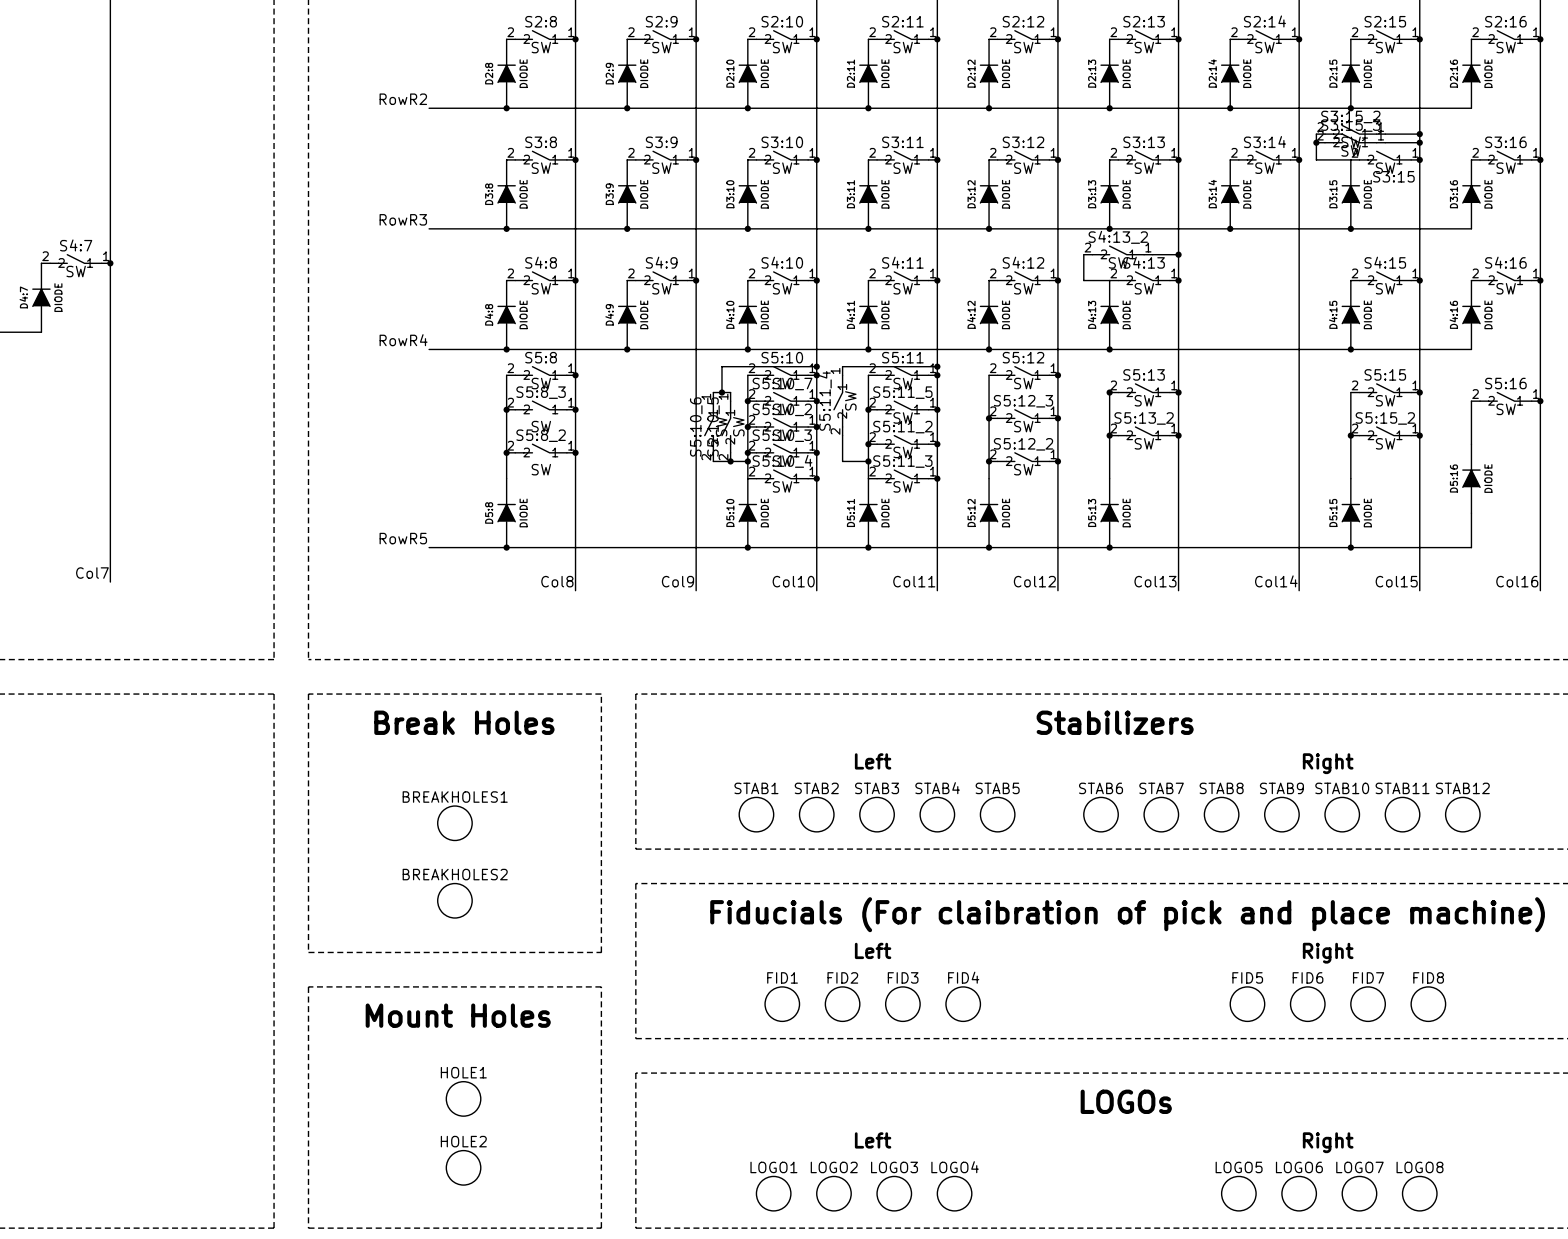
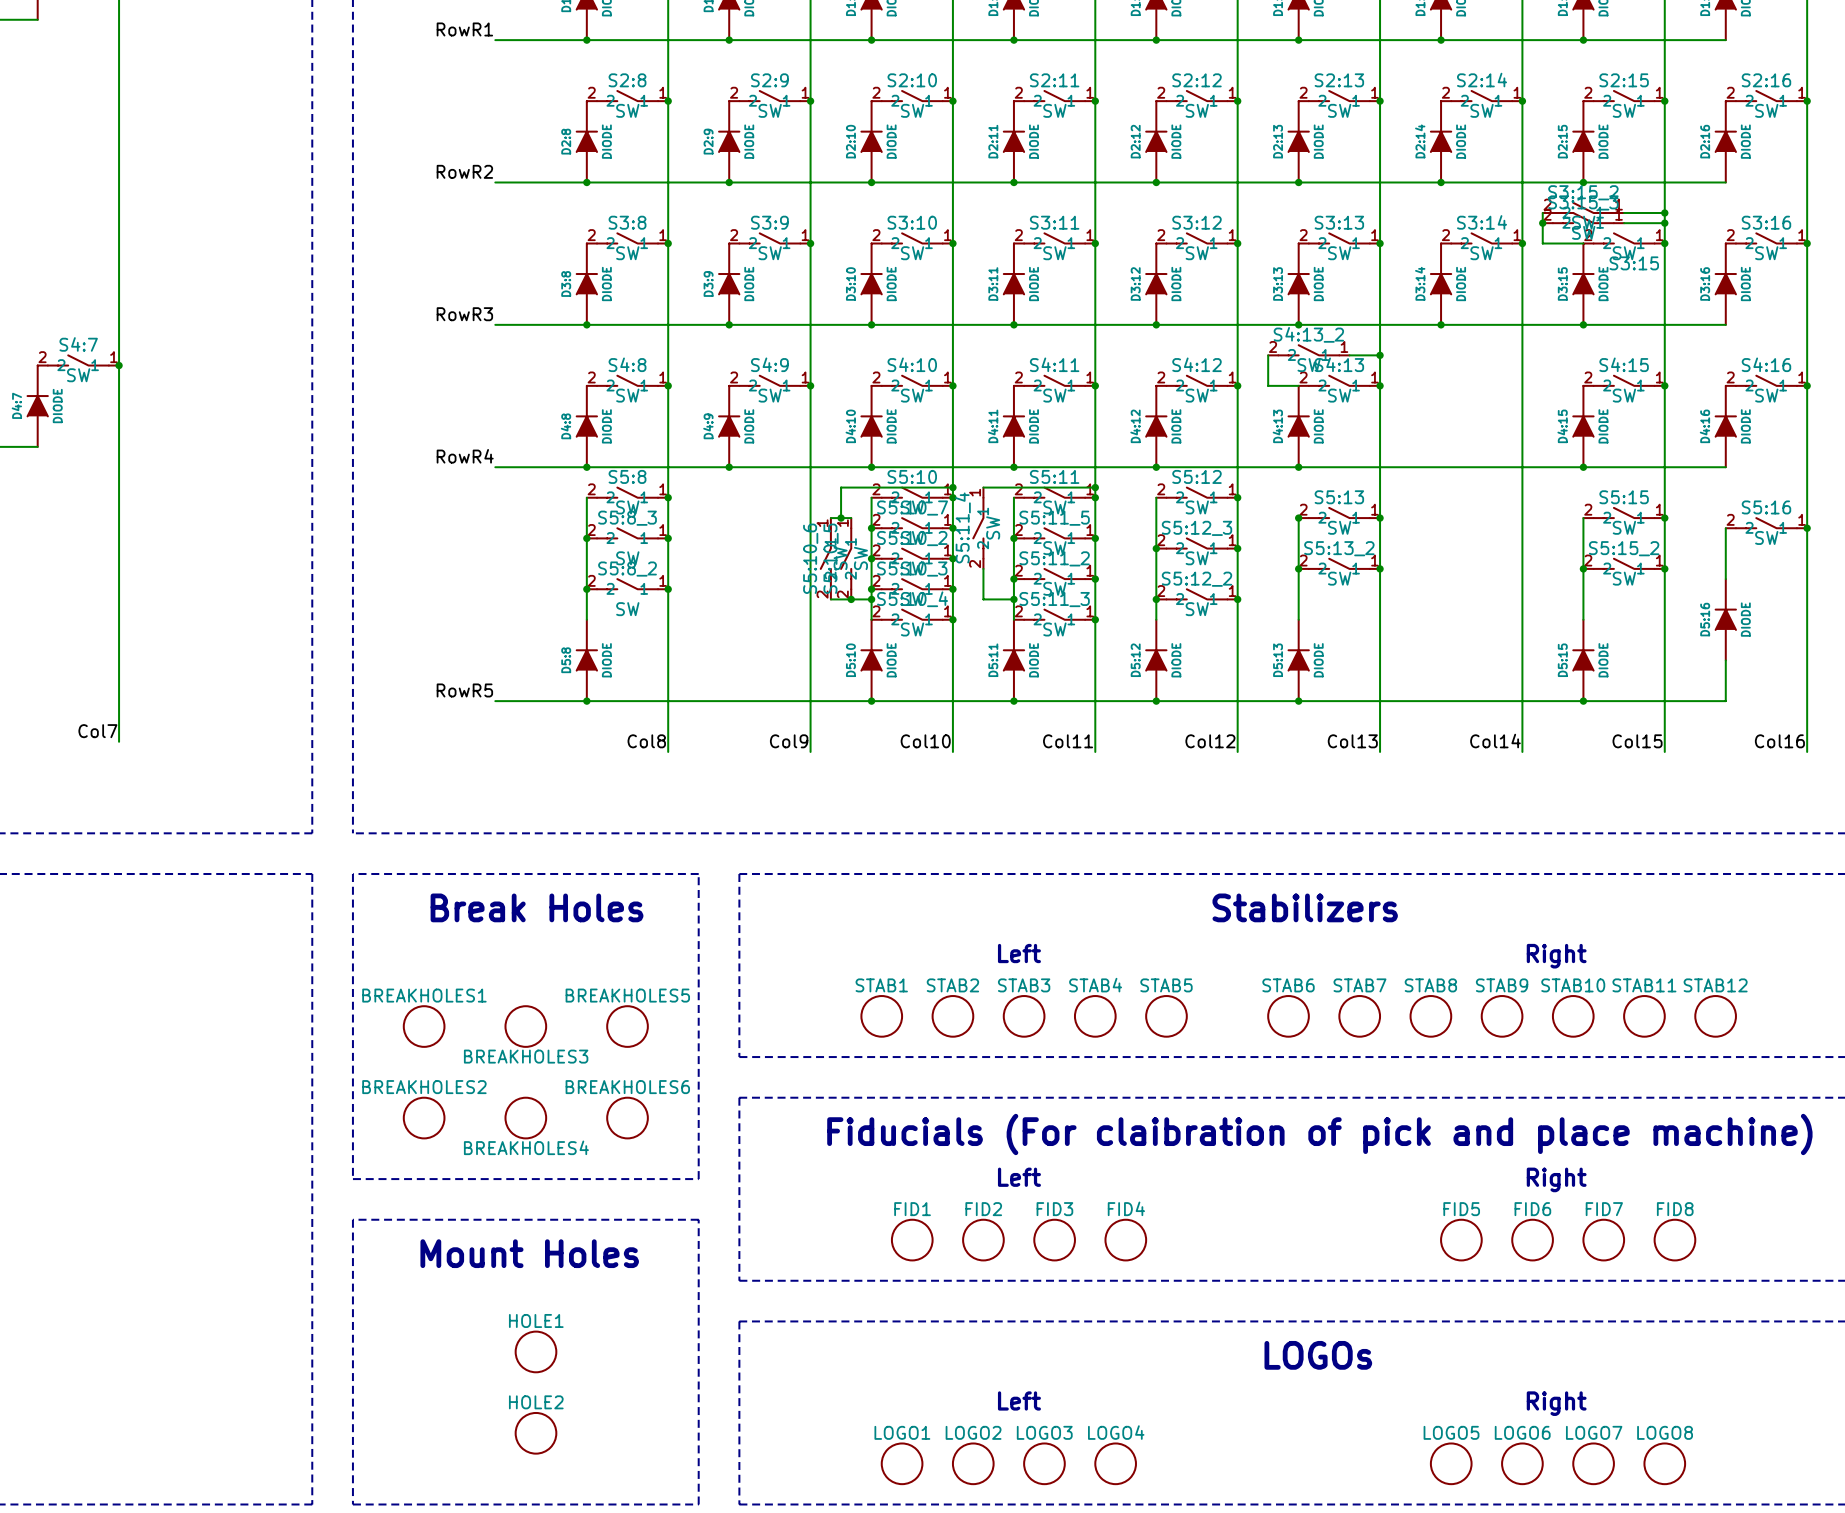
BREAKHOLES1 name: BREAKHOLES1 (455, 797) -> BREAKHOLES3 (526, 1056)
BREAKHOLES1: none -> (424, 1026)
BREAKHOLES5: none -> (627, 1026)
BREAKHOLES2 name: BREAKHOLES2 (455, 874) -> BREAKHOLES4 (526, 1147)
BREAKHOLES2: none -> (424, 1118)
BREAKHOLES6: none -> (627, 1118)

